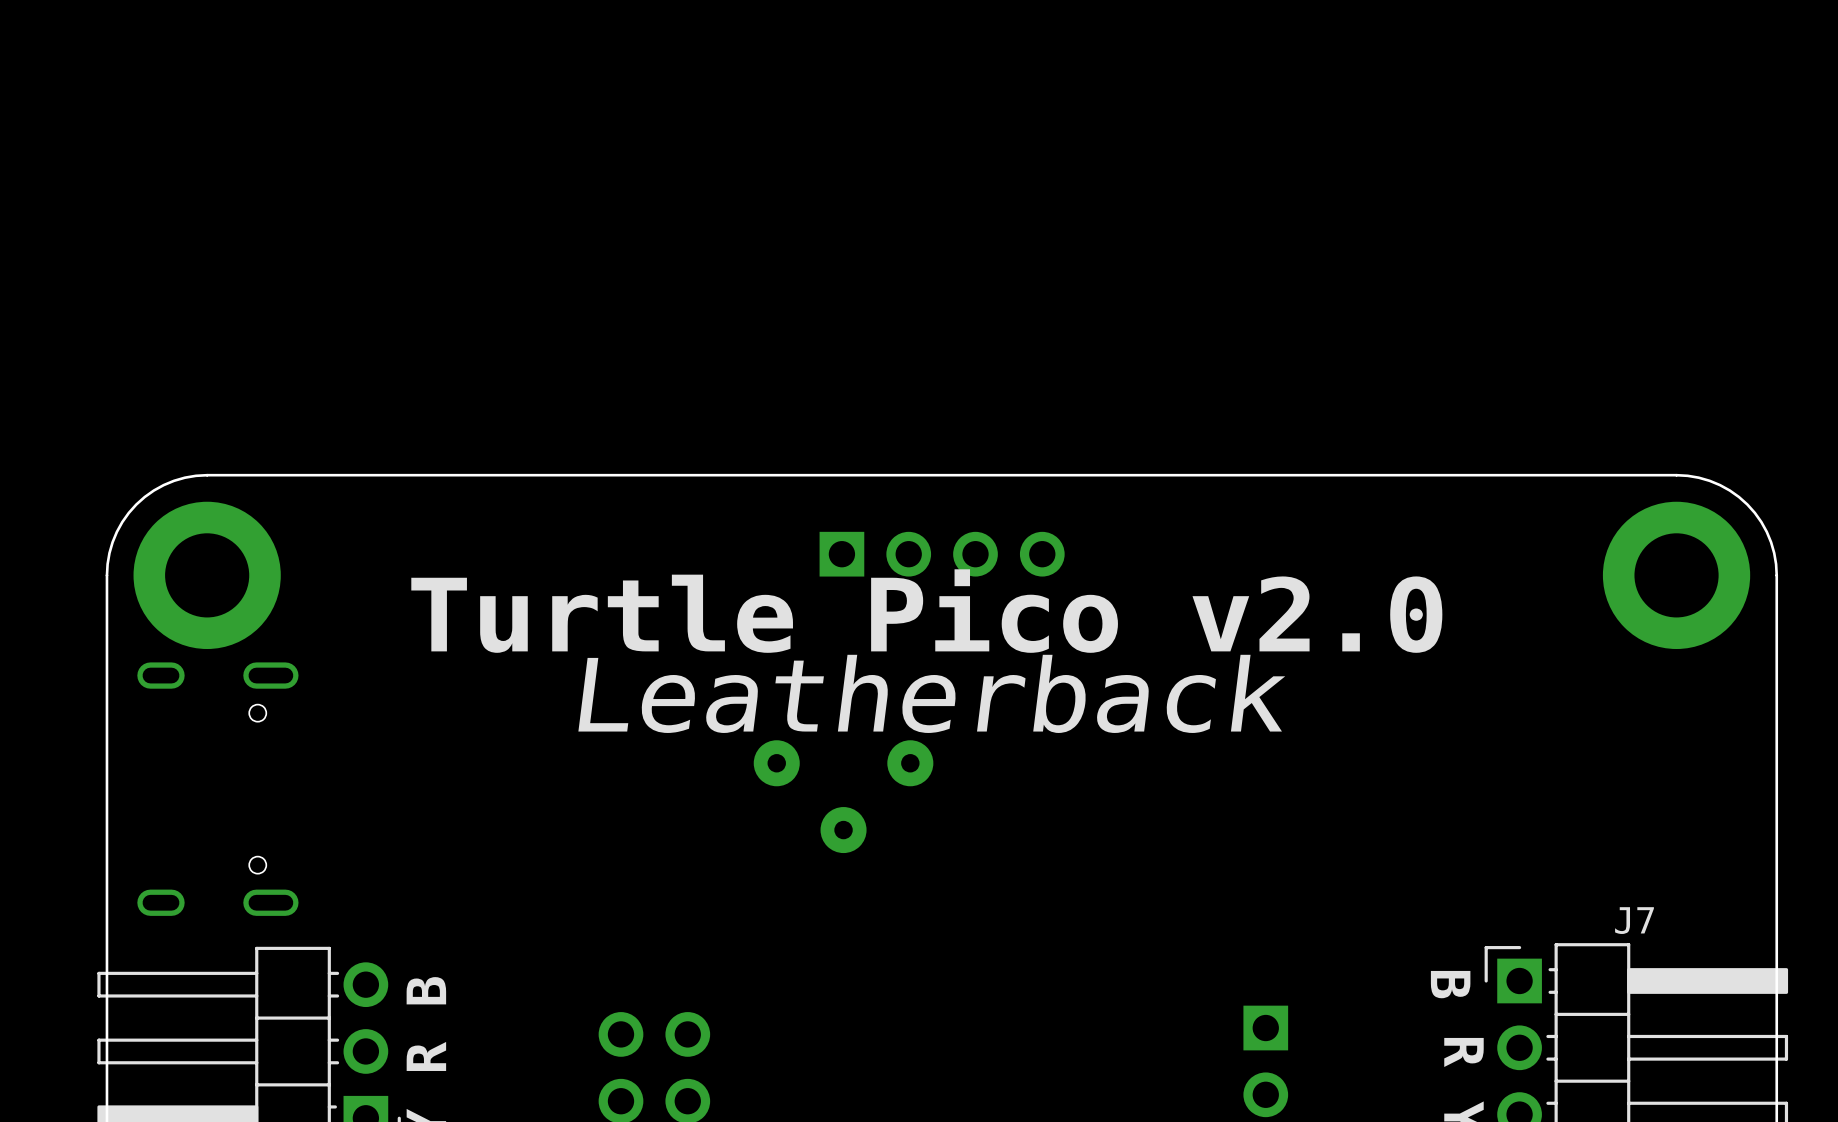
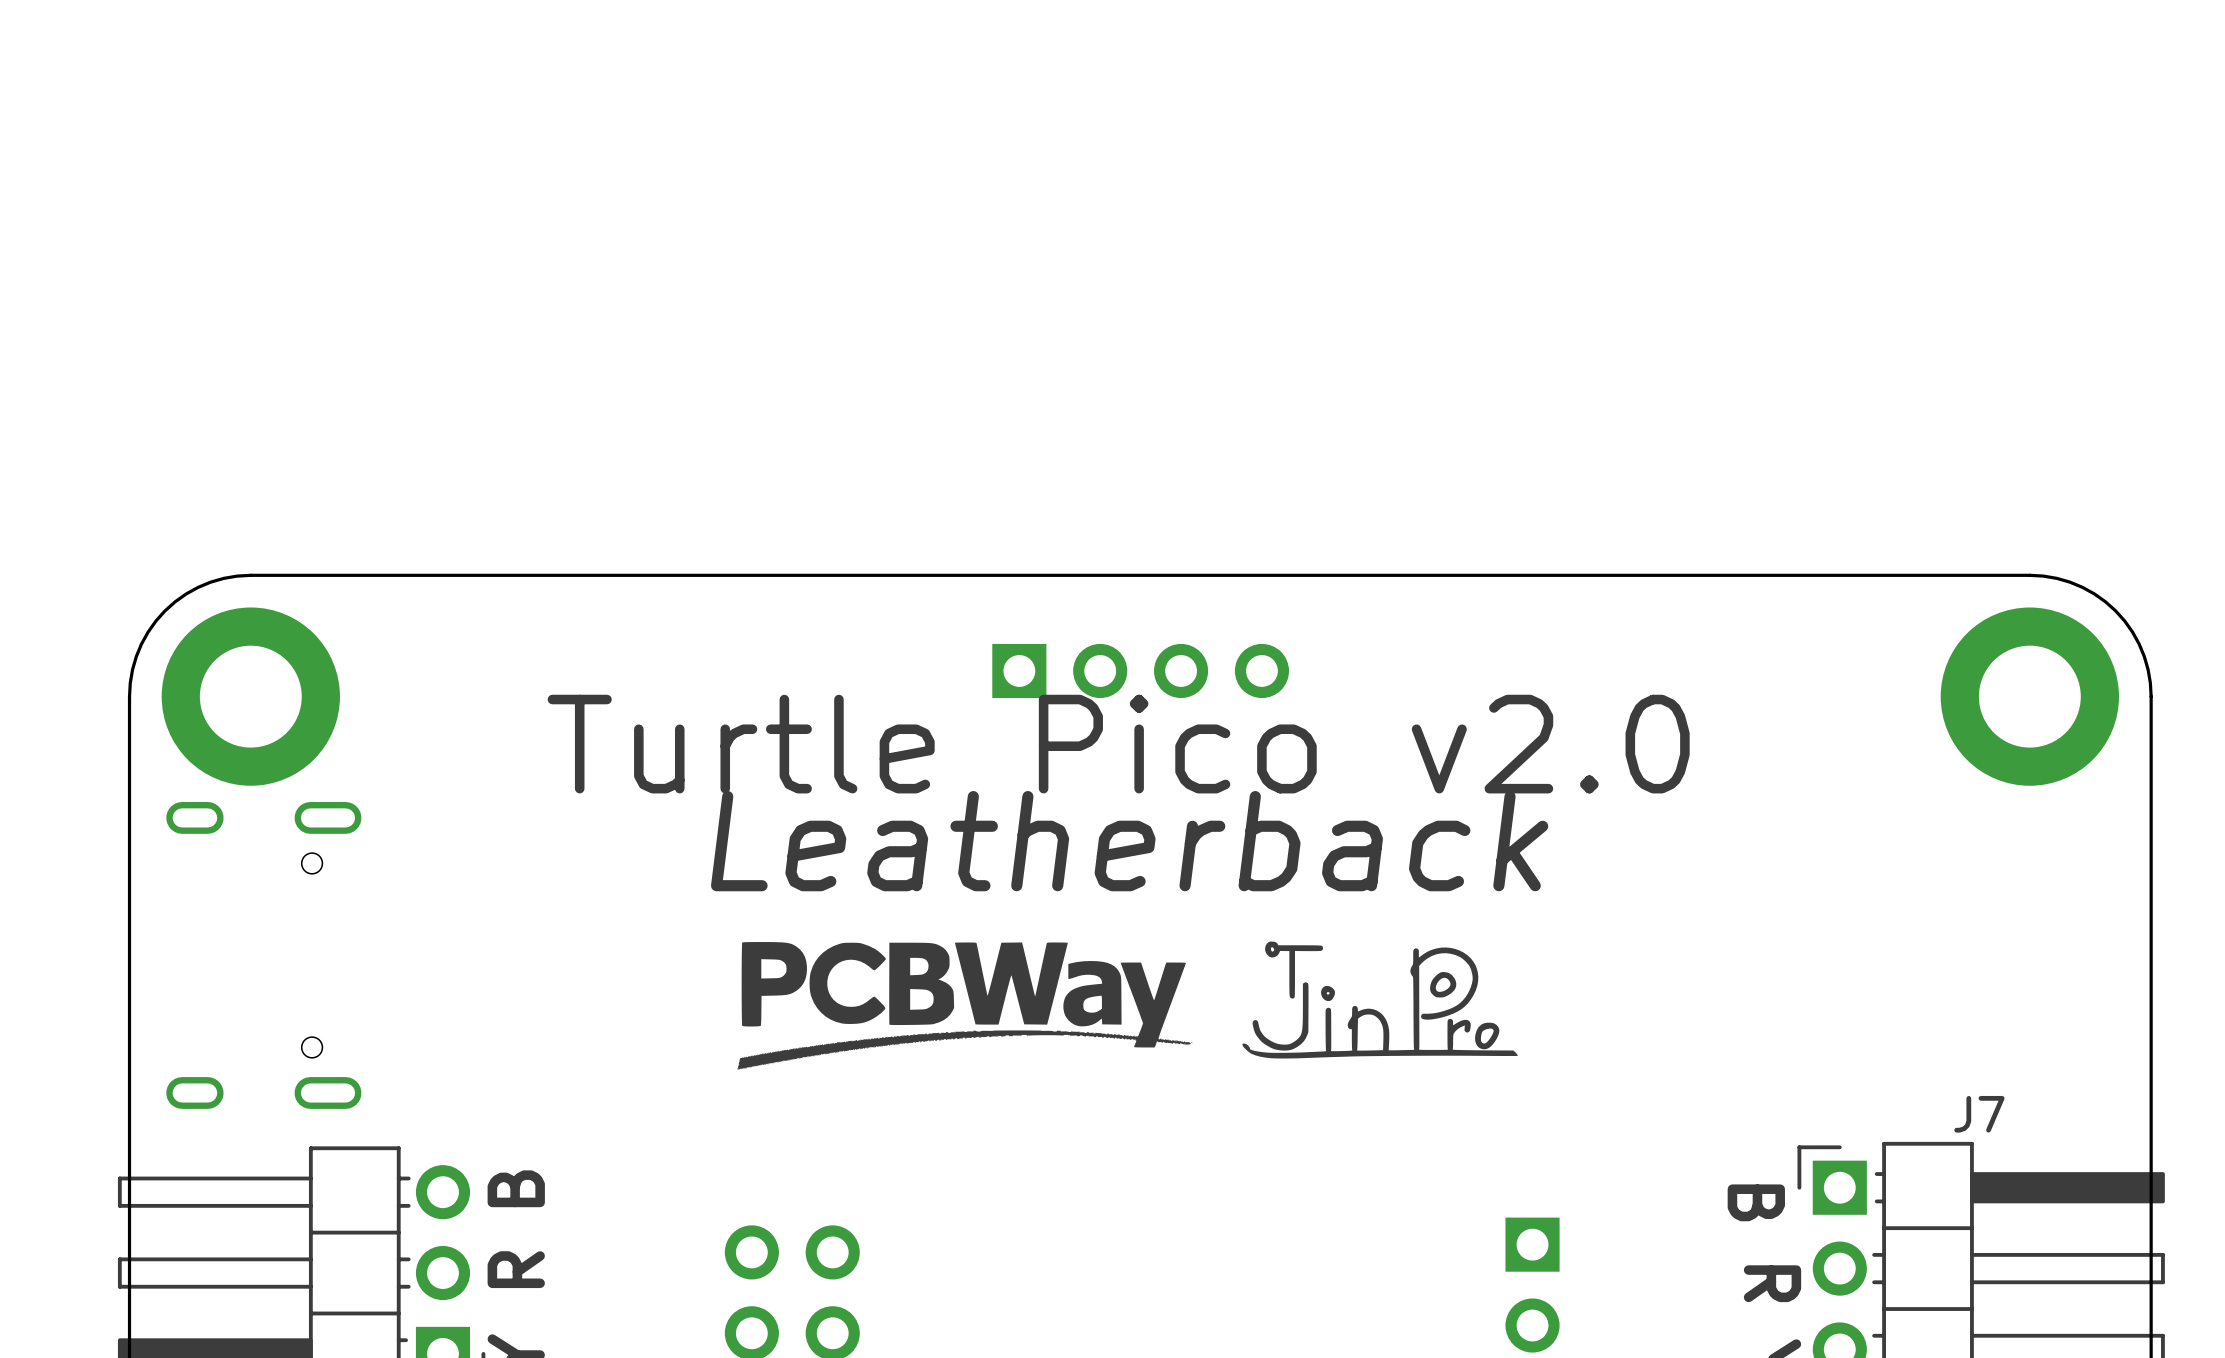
drawing: none -> [1242, 941, 1518, 1059]
drawing: none -> [737, 942, 1193, 1070]
part: (843, 796) -> none

